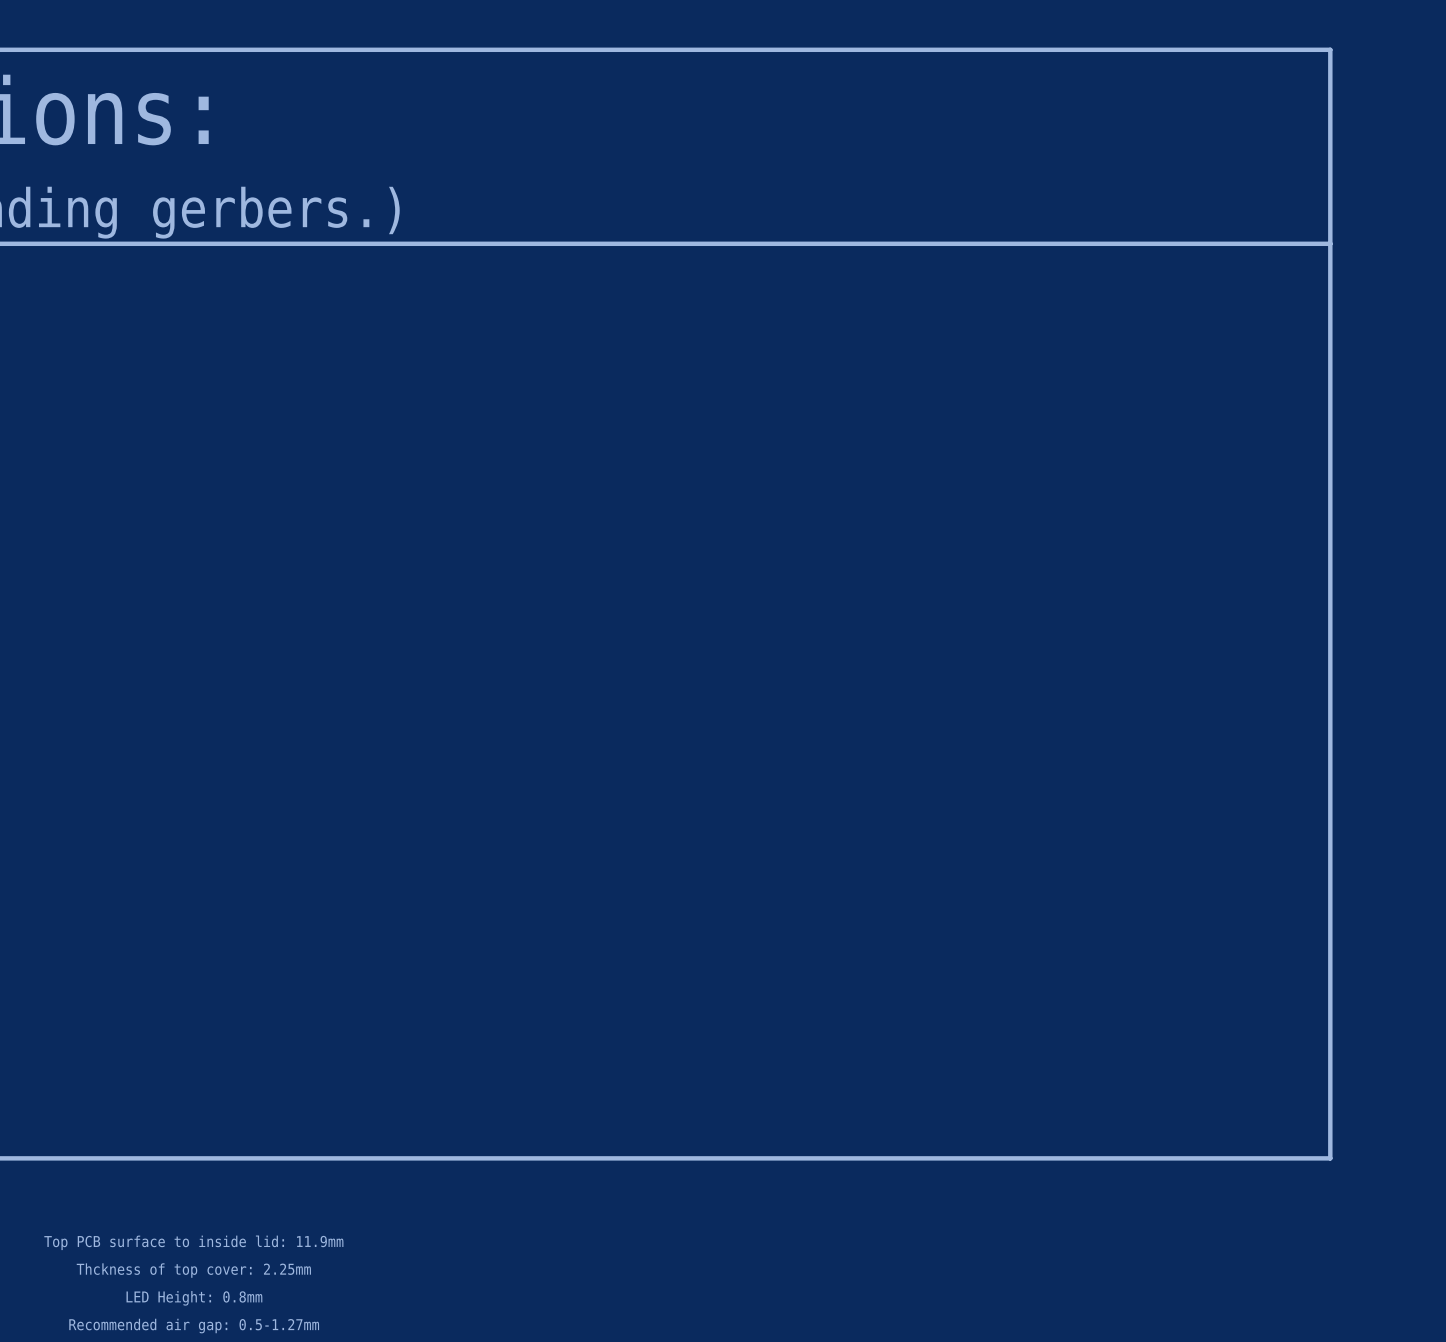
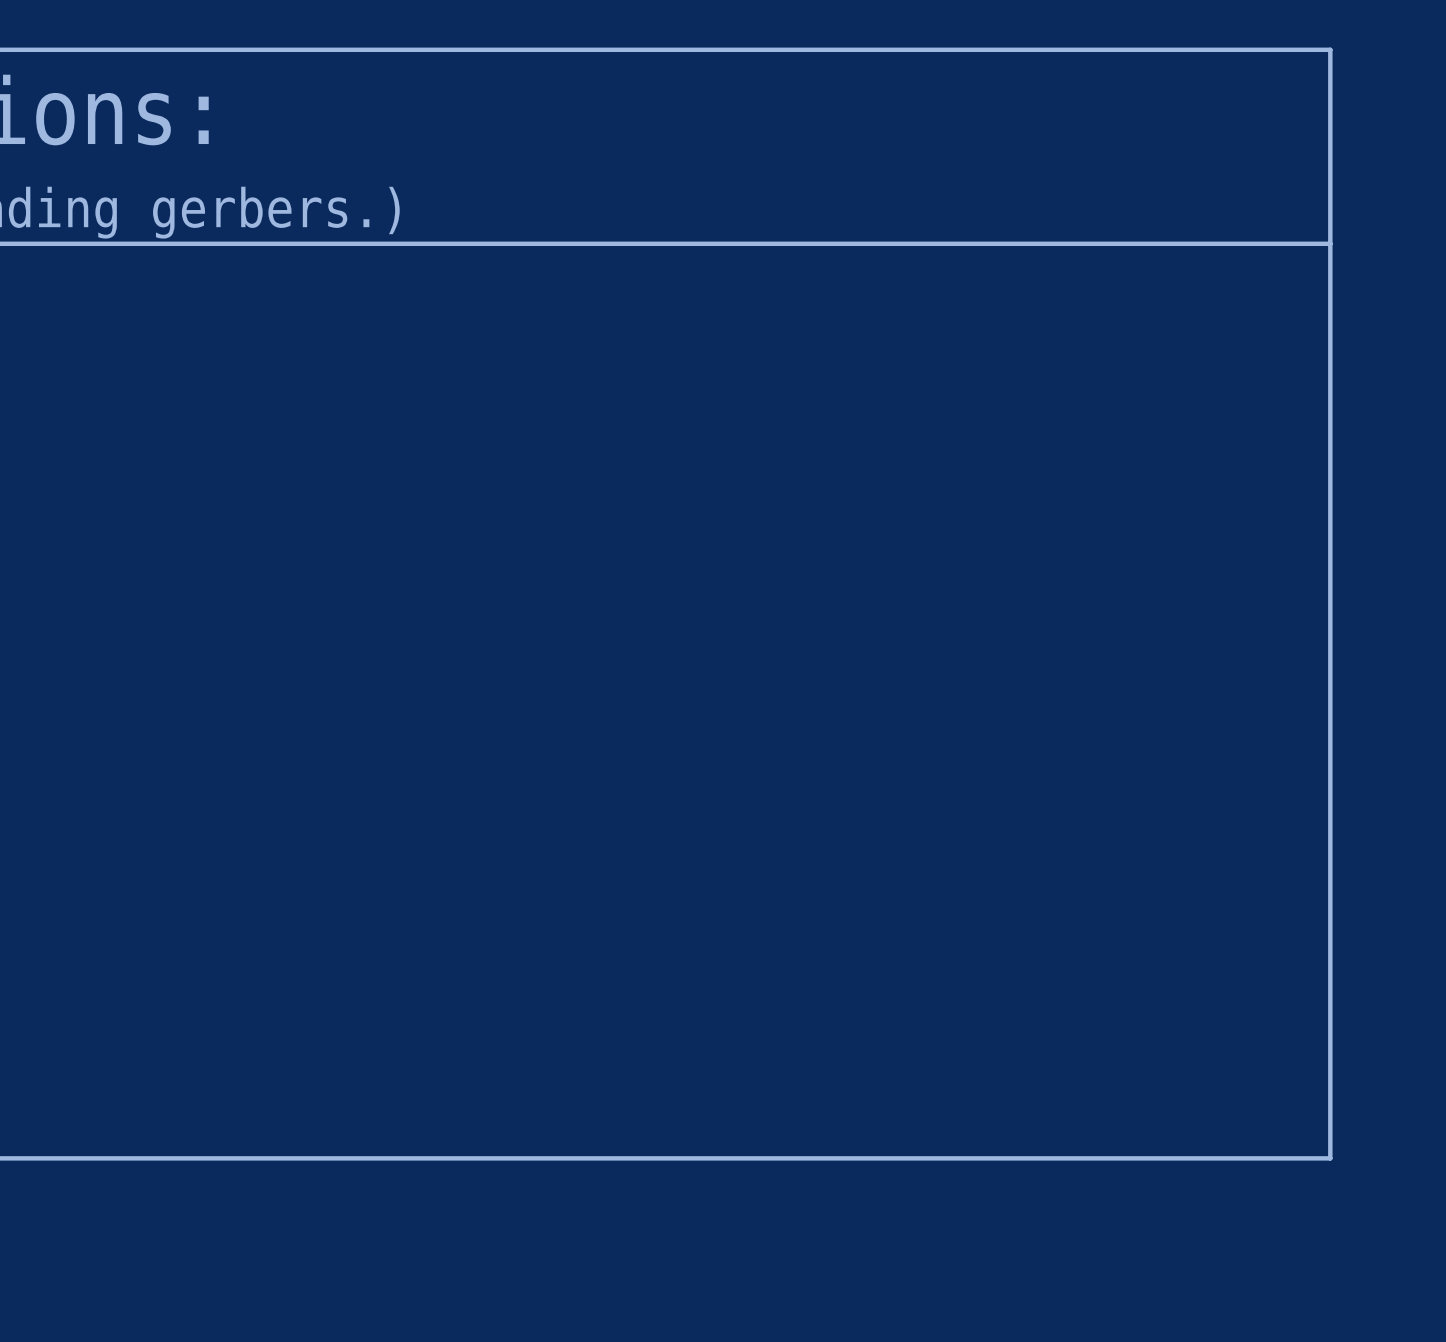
text: Top PCB surface to inside lid: 11.9mm (193, 1242) -> none
text: Thckness of top cover: 2.25mm (193, 1270) -> none
text: LED Height: 0.8mm (194, 1298) -> none
text: Recommended air gap: 0.5-1.27mm (194, 1326) -> none

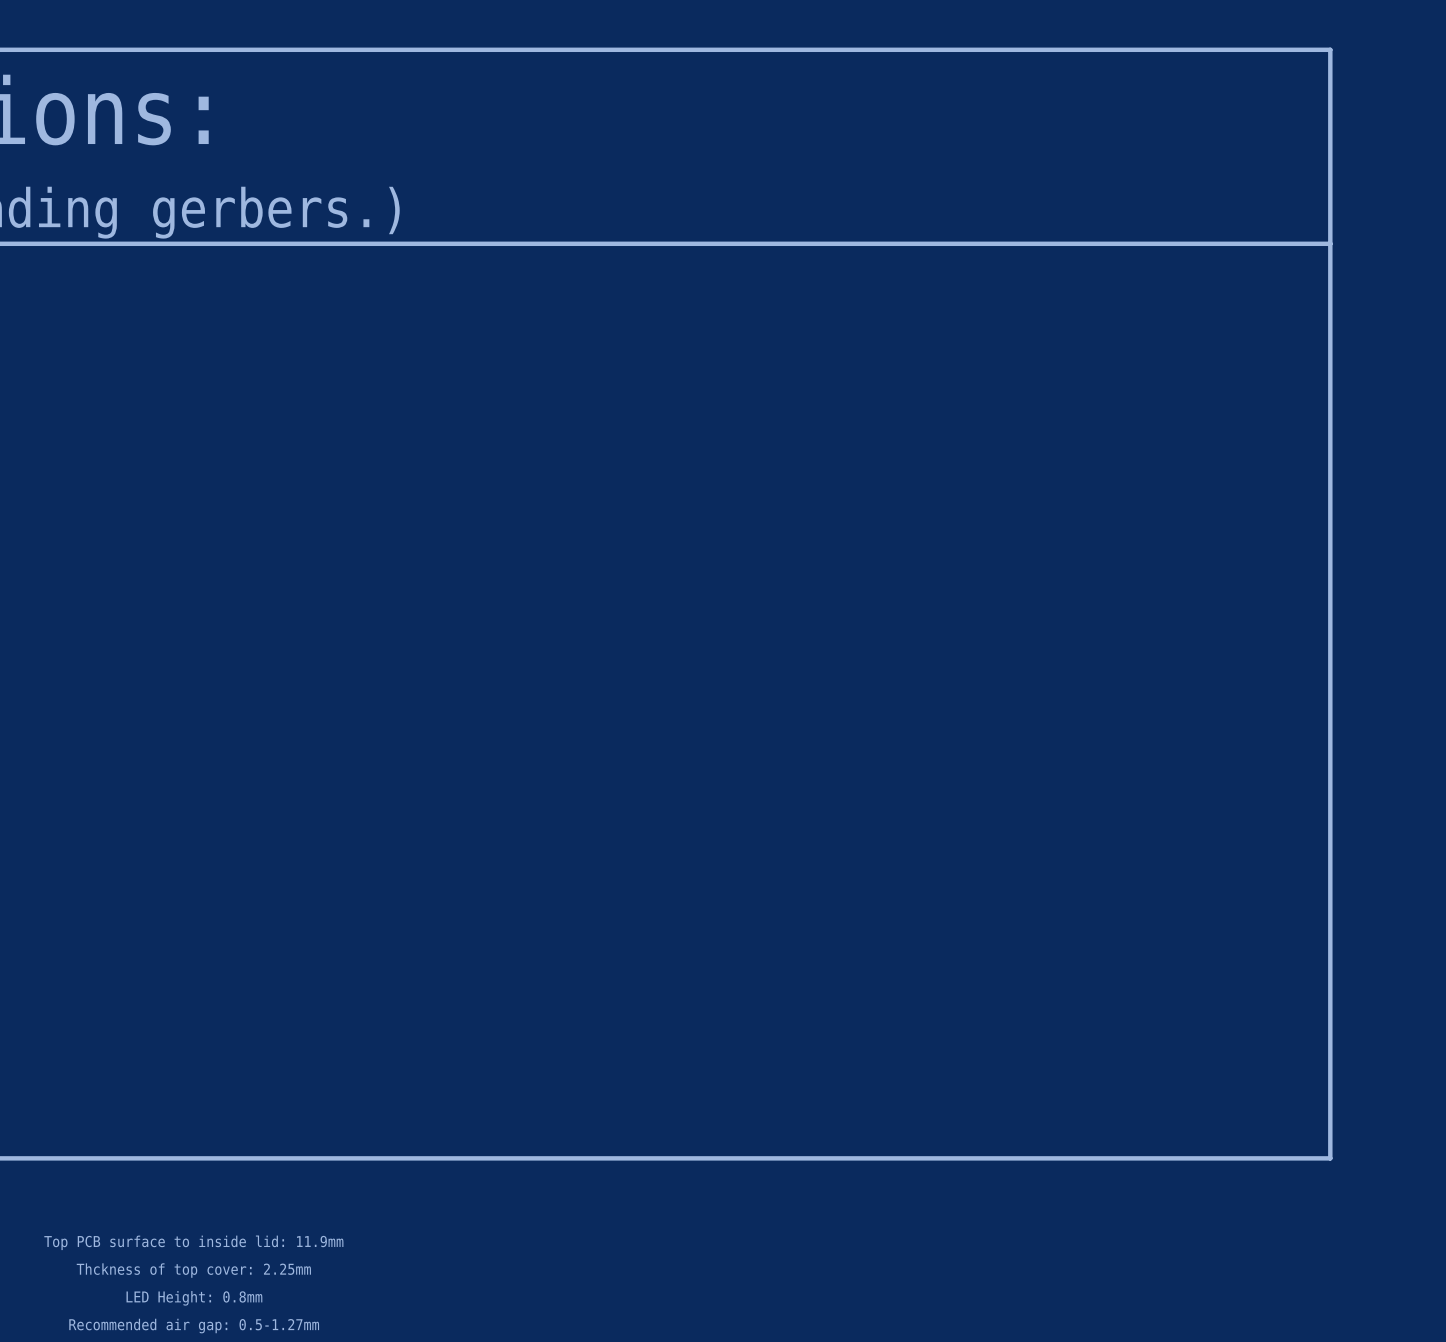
text: none -> Top PCB surface to inside lid: 11.9mm (193, 1242)
text: none -> Thckness of top cover: 2.25mm (193, 1270)
text: none -> LED Height: 0.8mm (194, 1298)
text: none -> Recommended air gap: 0.5-1.27mm (194, 1326)

